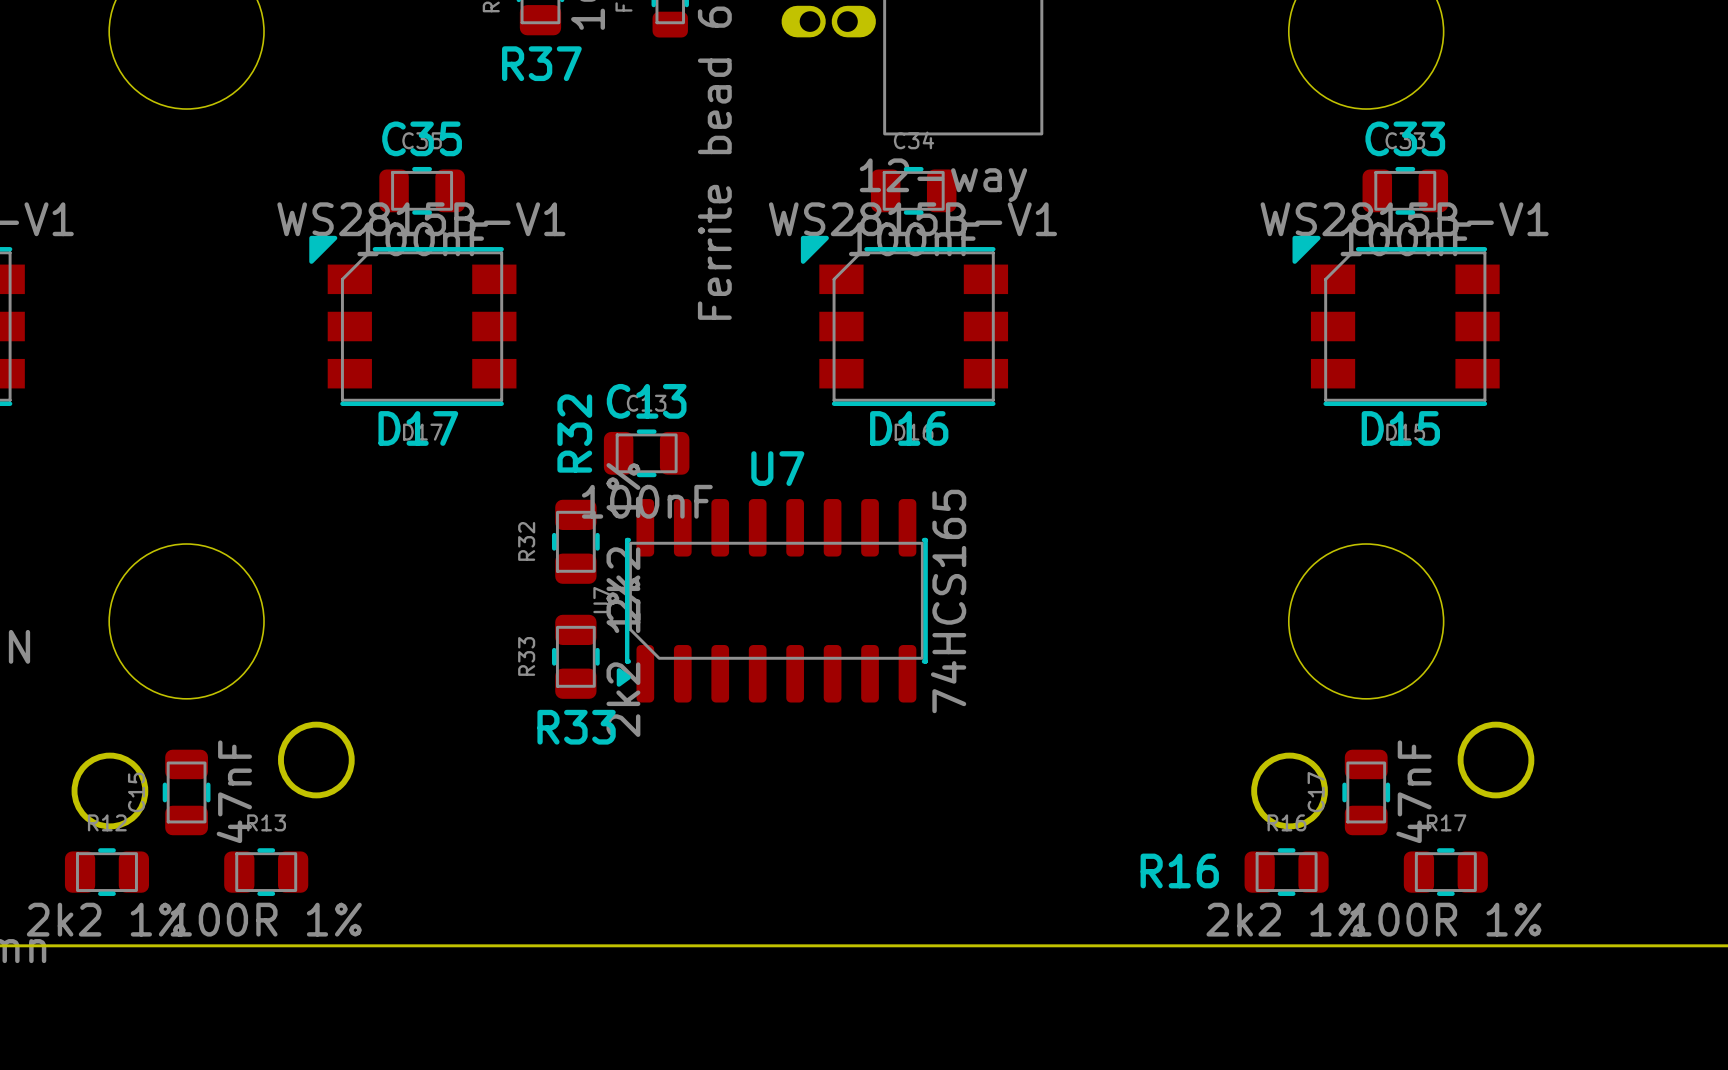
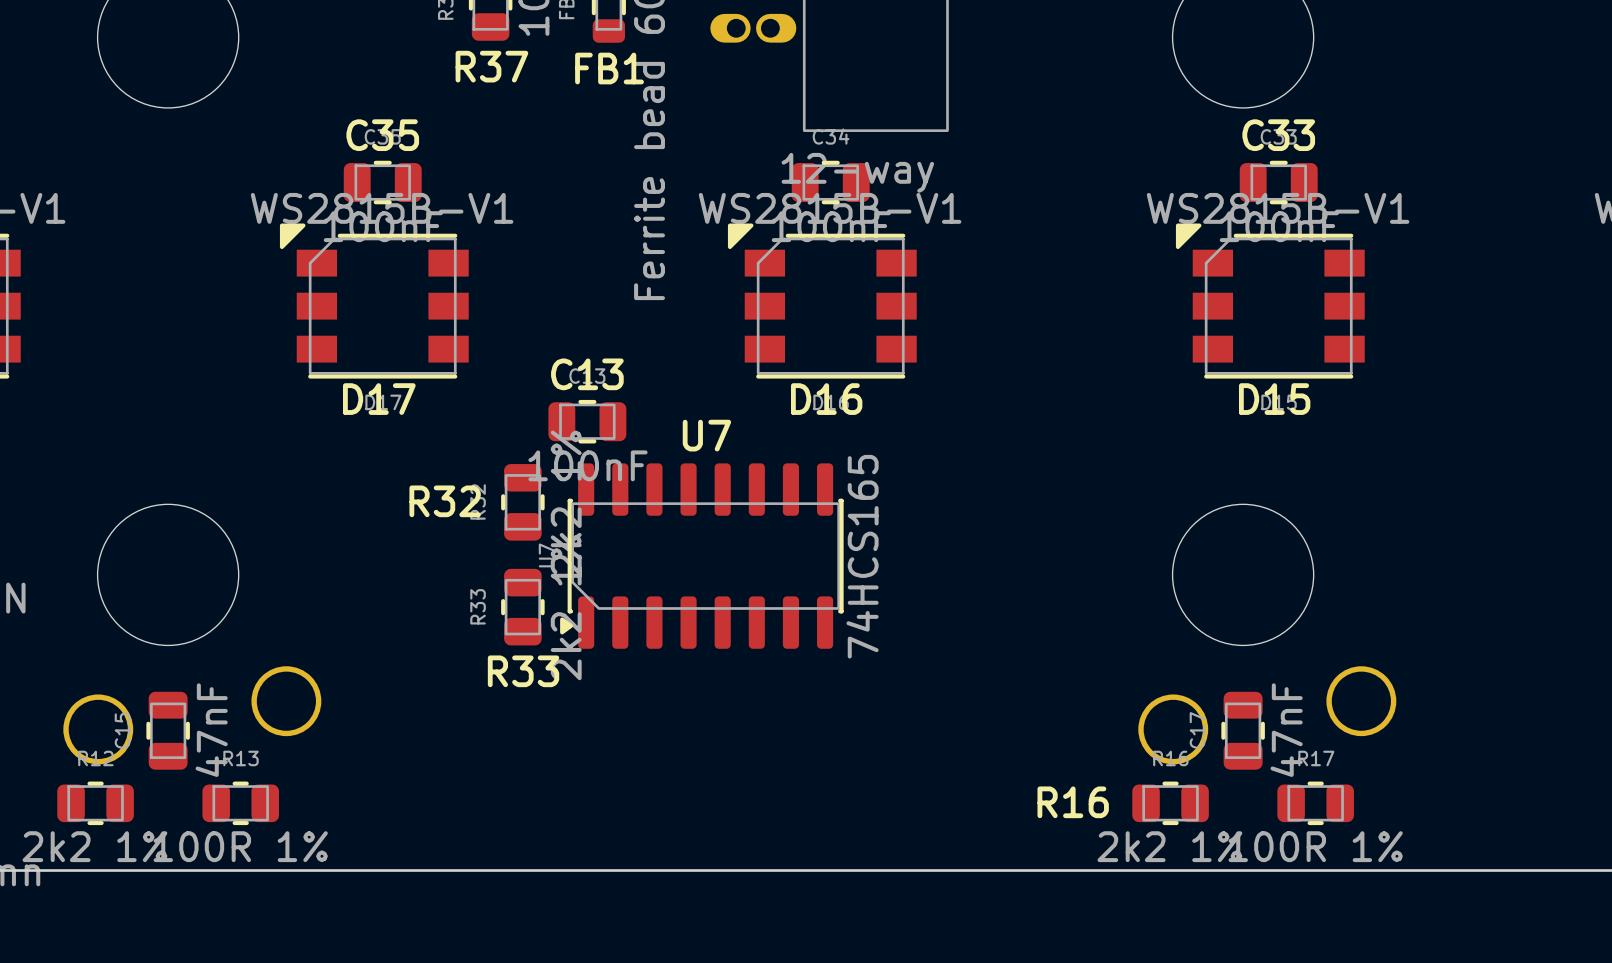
text: none -> FB1 (609, 68)
text rotation: 0° (574, 433) -> 90° clockwise (445, 501)
text position: R32 (574, 433) -> R32 (445, 501)

